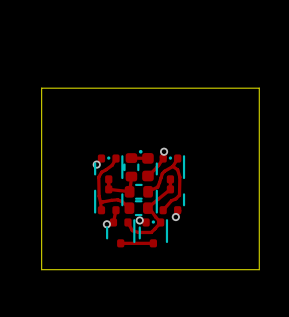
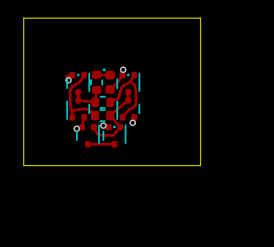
track: none -> (72, 75) (66, 76)

